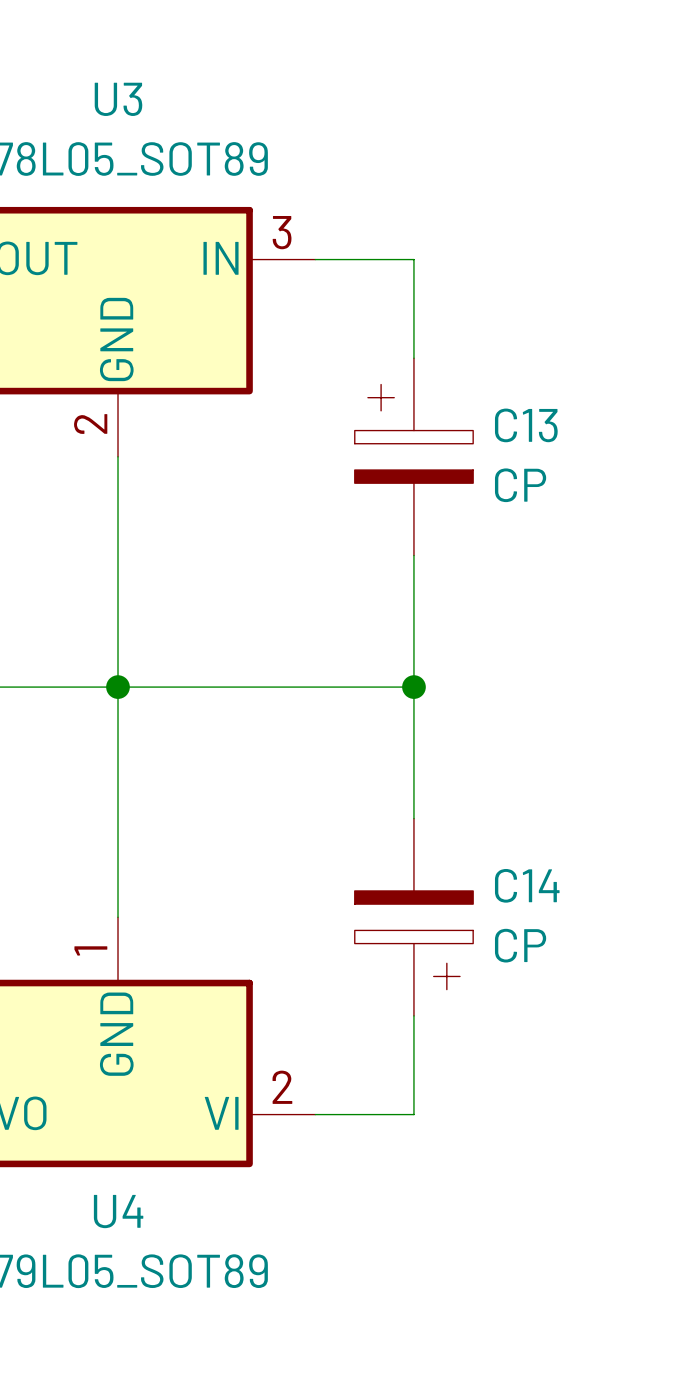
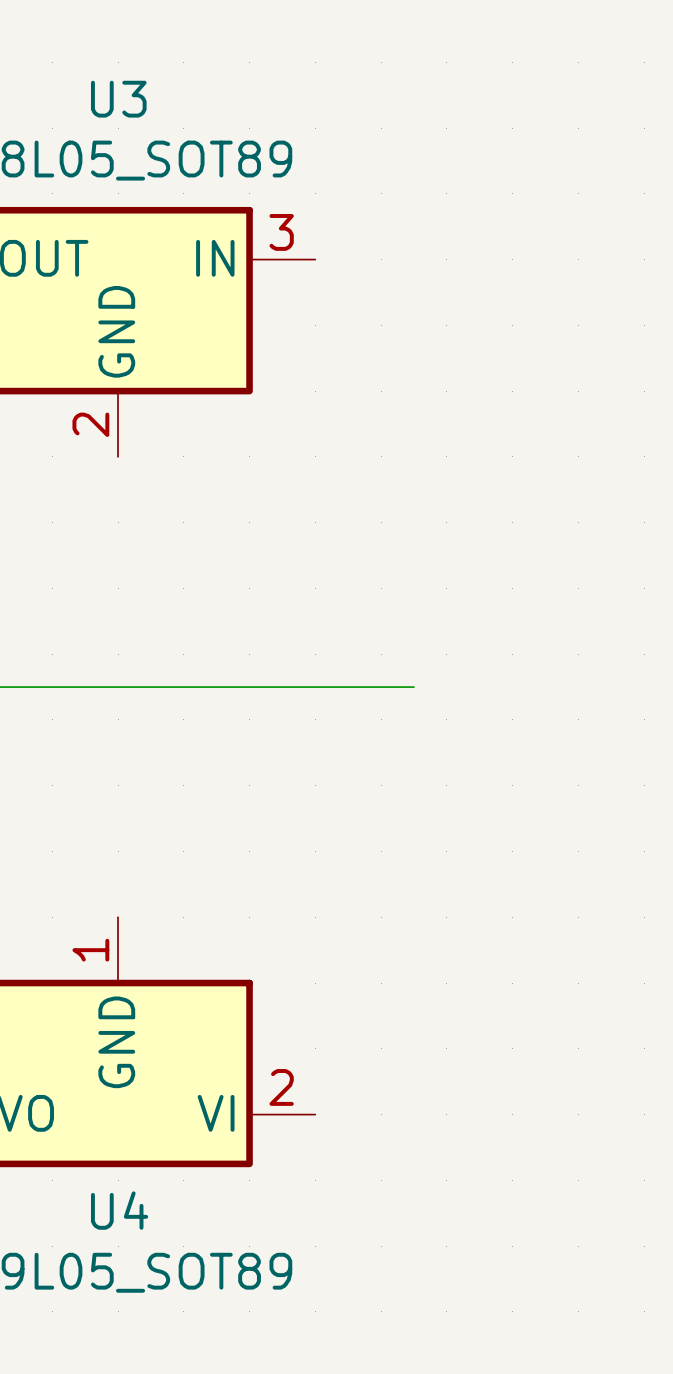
wire: (315, 259) (413, 259) (413, 358) -> none
wire: (118, 456) (118, 917) -> none
C13: CP (413, 456) -> none
wire: (413, 555) (413, 818) -> none
junction: (118, 687) -> none
junction: (413, 687) -> none
C14: CP (413, 917) -> none
wire: (413, 1015) (413, 1114) (315, 1114) -> none

